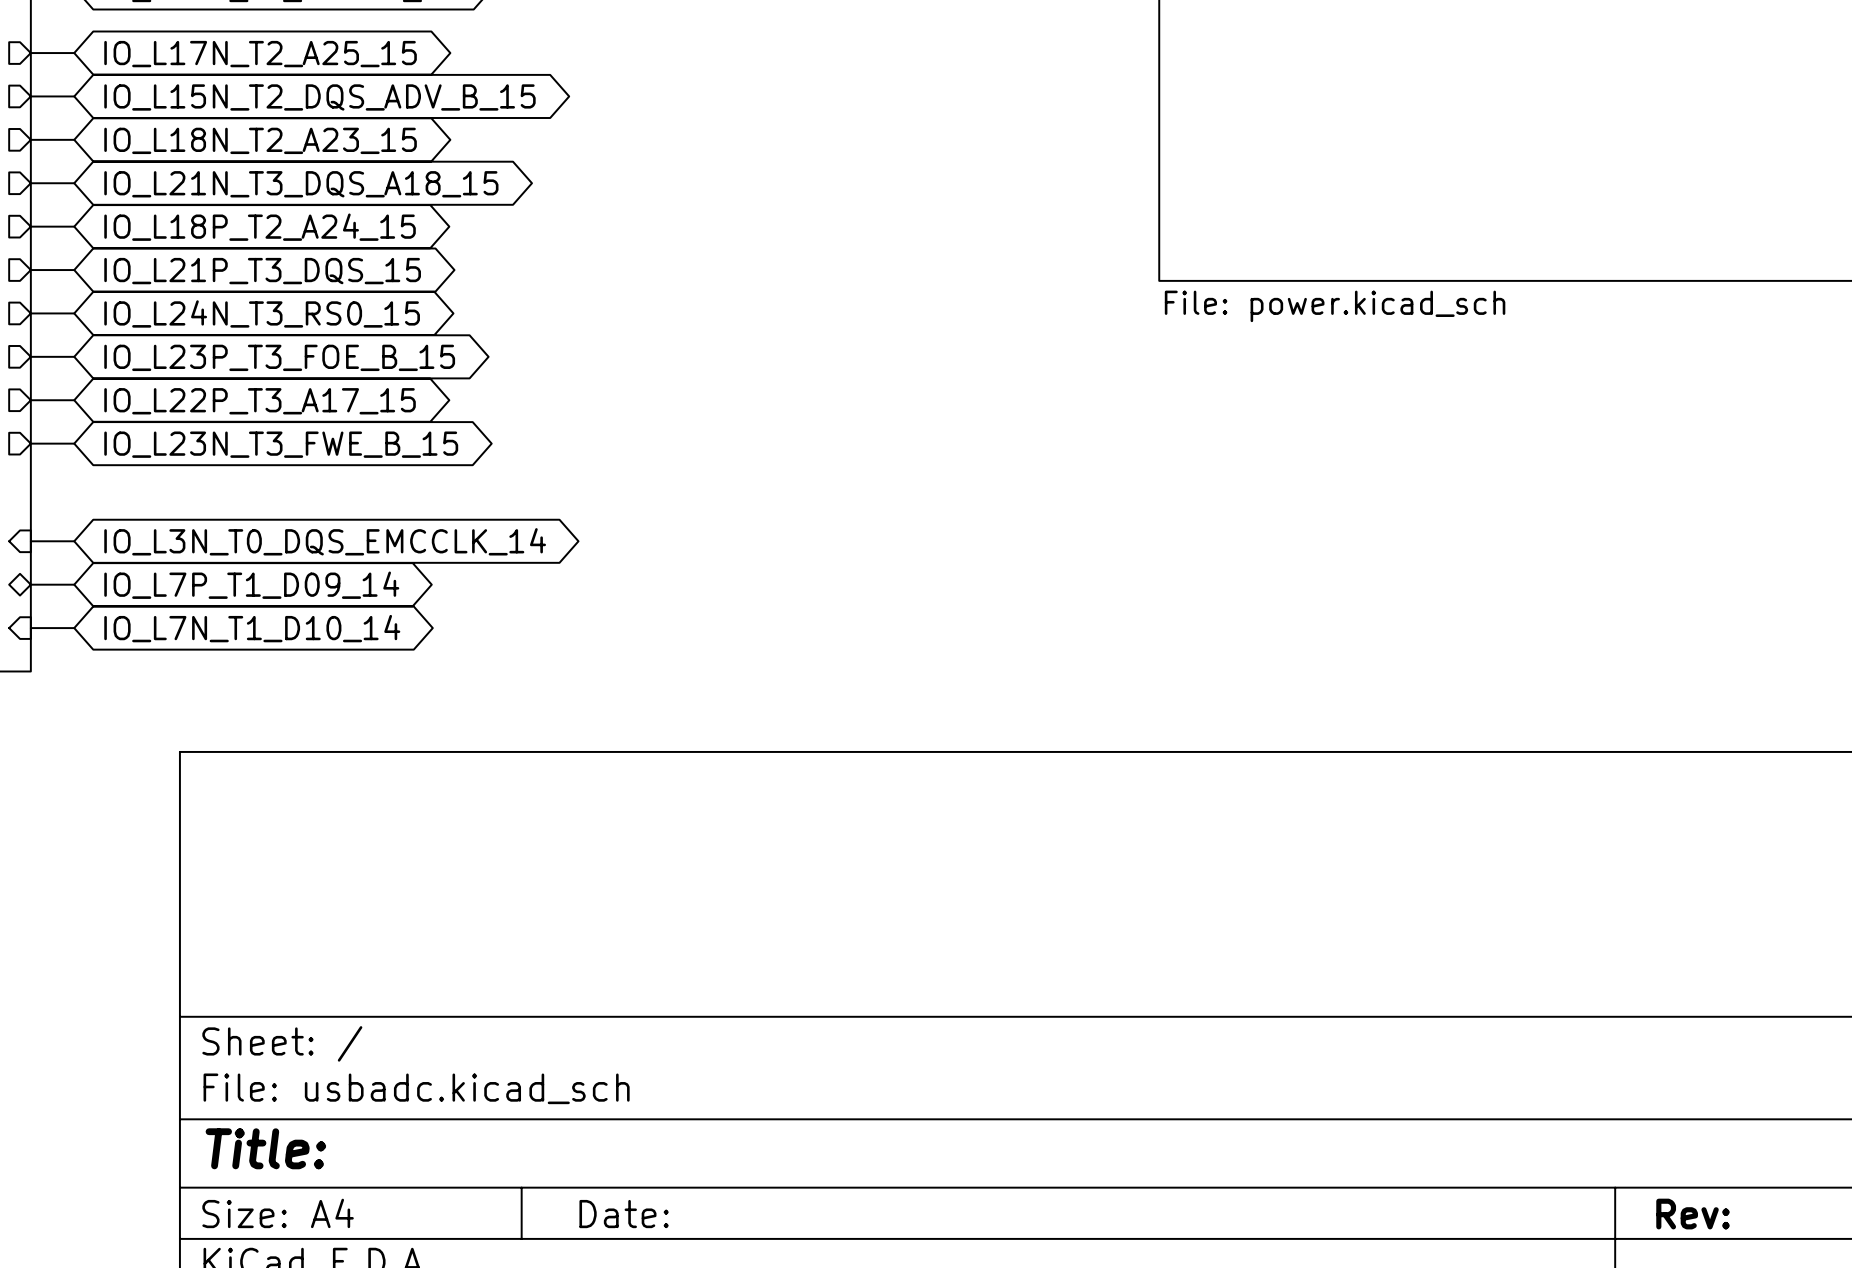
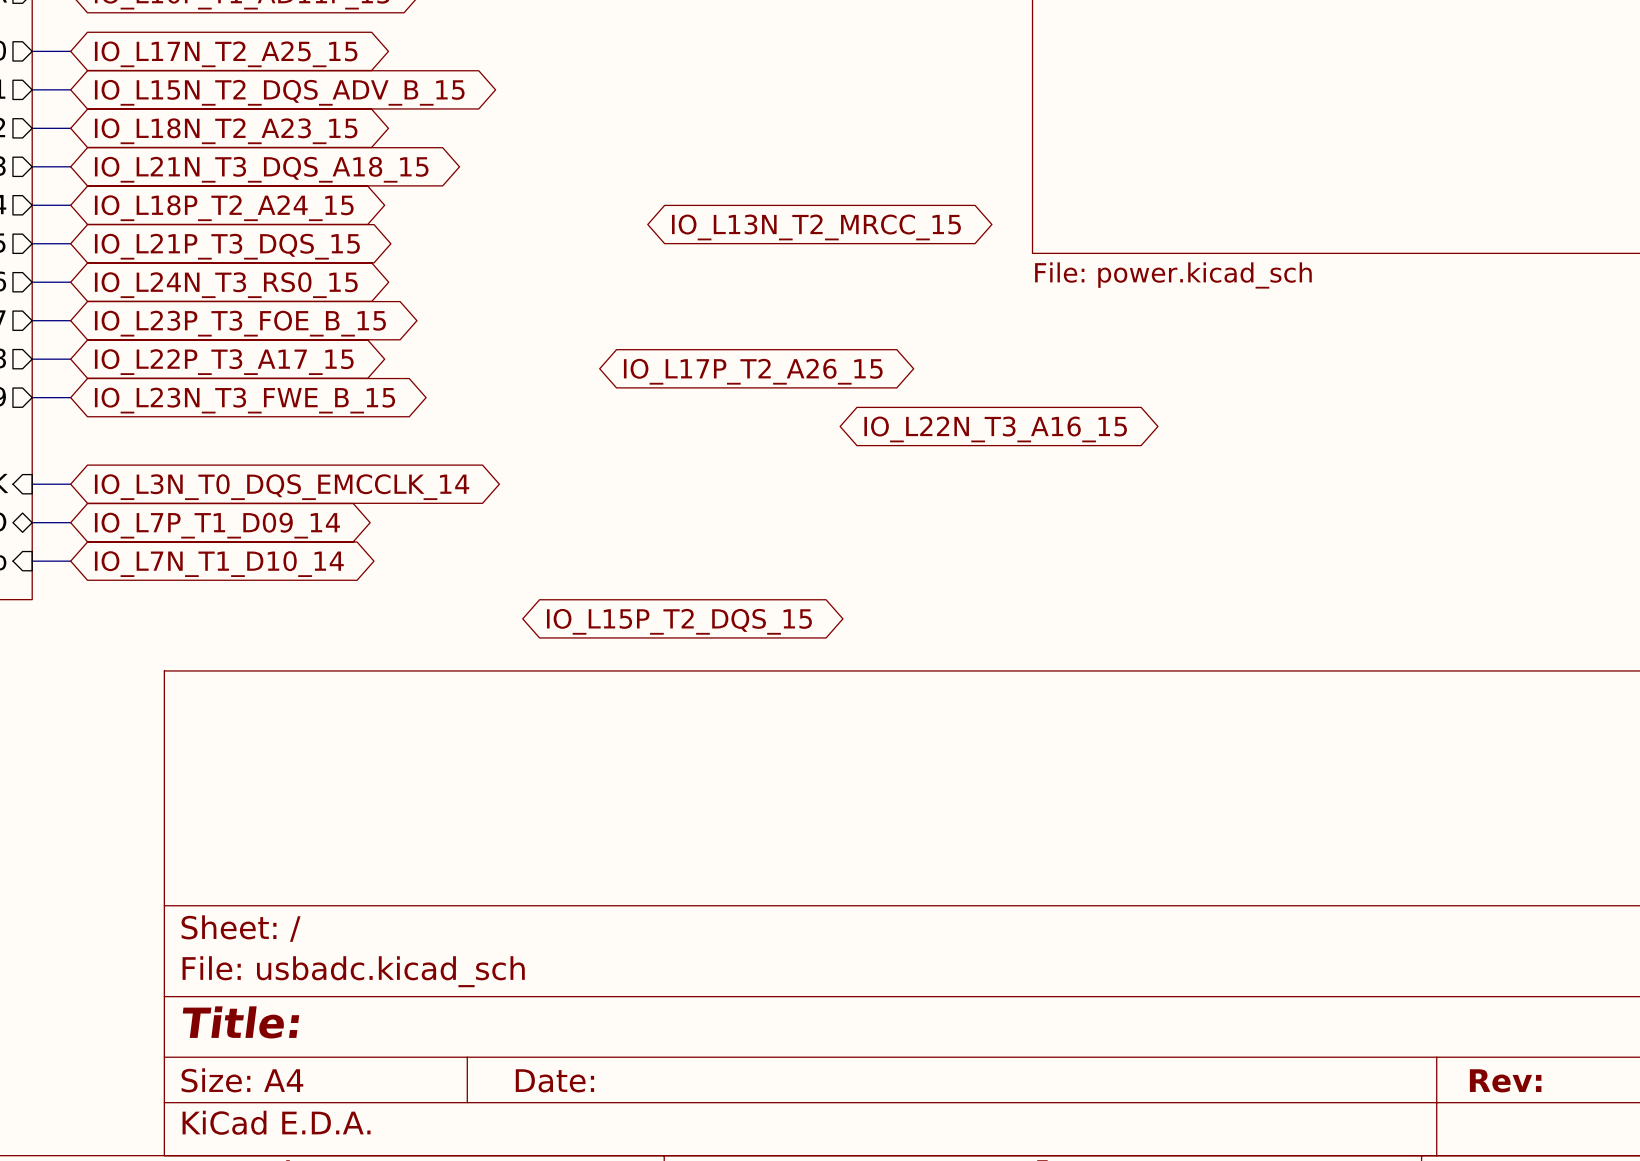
global label: none -> IO_L13N_T2_MRCC_15 (816, 227)
global label: none -> IO_L17P_T2_A26_15 (753, 371)
global label: none -> IO_L22N_T3_A16_15 (995, 429)
global label: none -> IO_L15P_T2_DQS_15 (679, 621)

